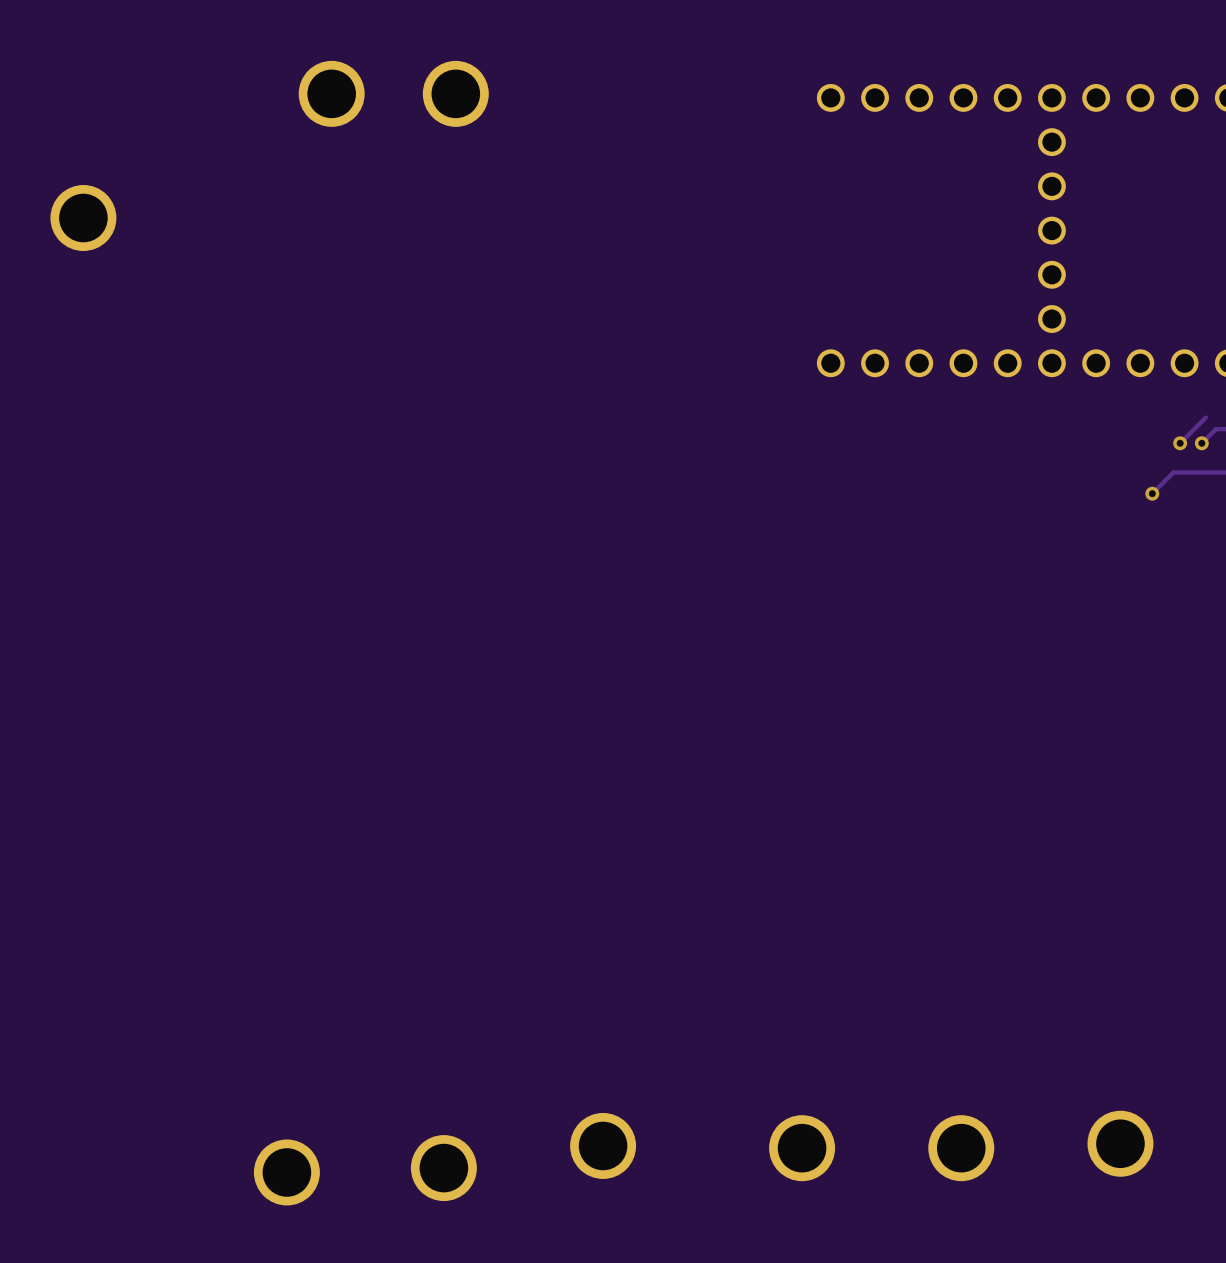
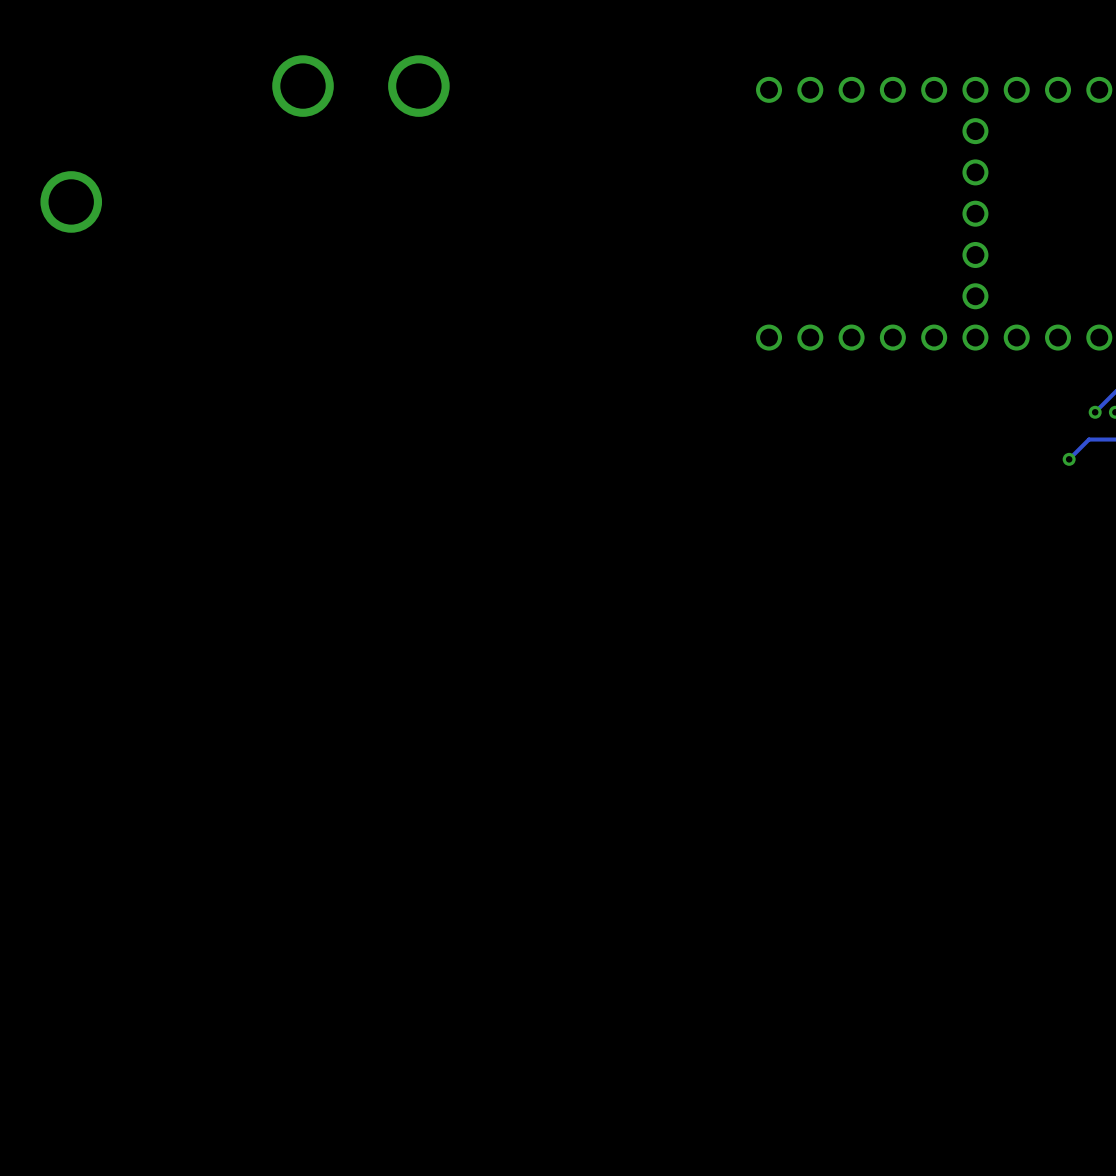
part: (1120, 1143) -> none
part: (603, 1145) -> none
part: (802, 1148) -> none
part: (961, 1148) -> none
part: (443, 1168) -> none
part: (286, 1172) -> none

